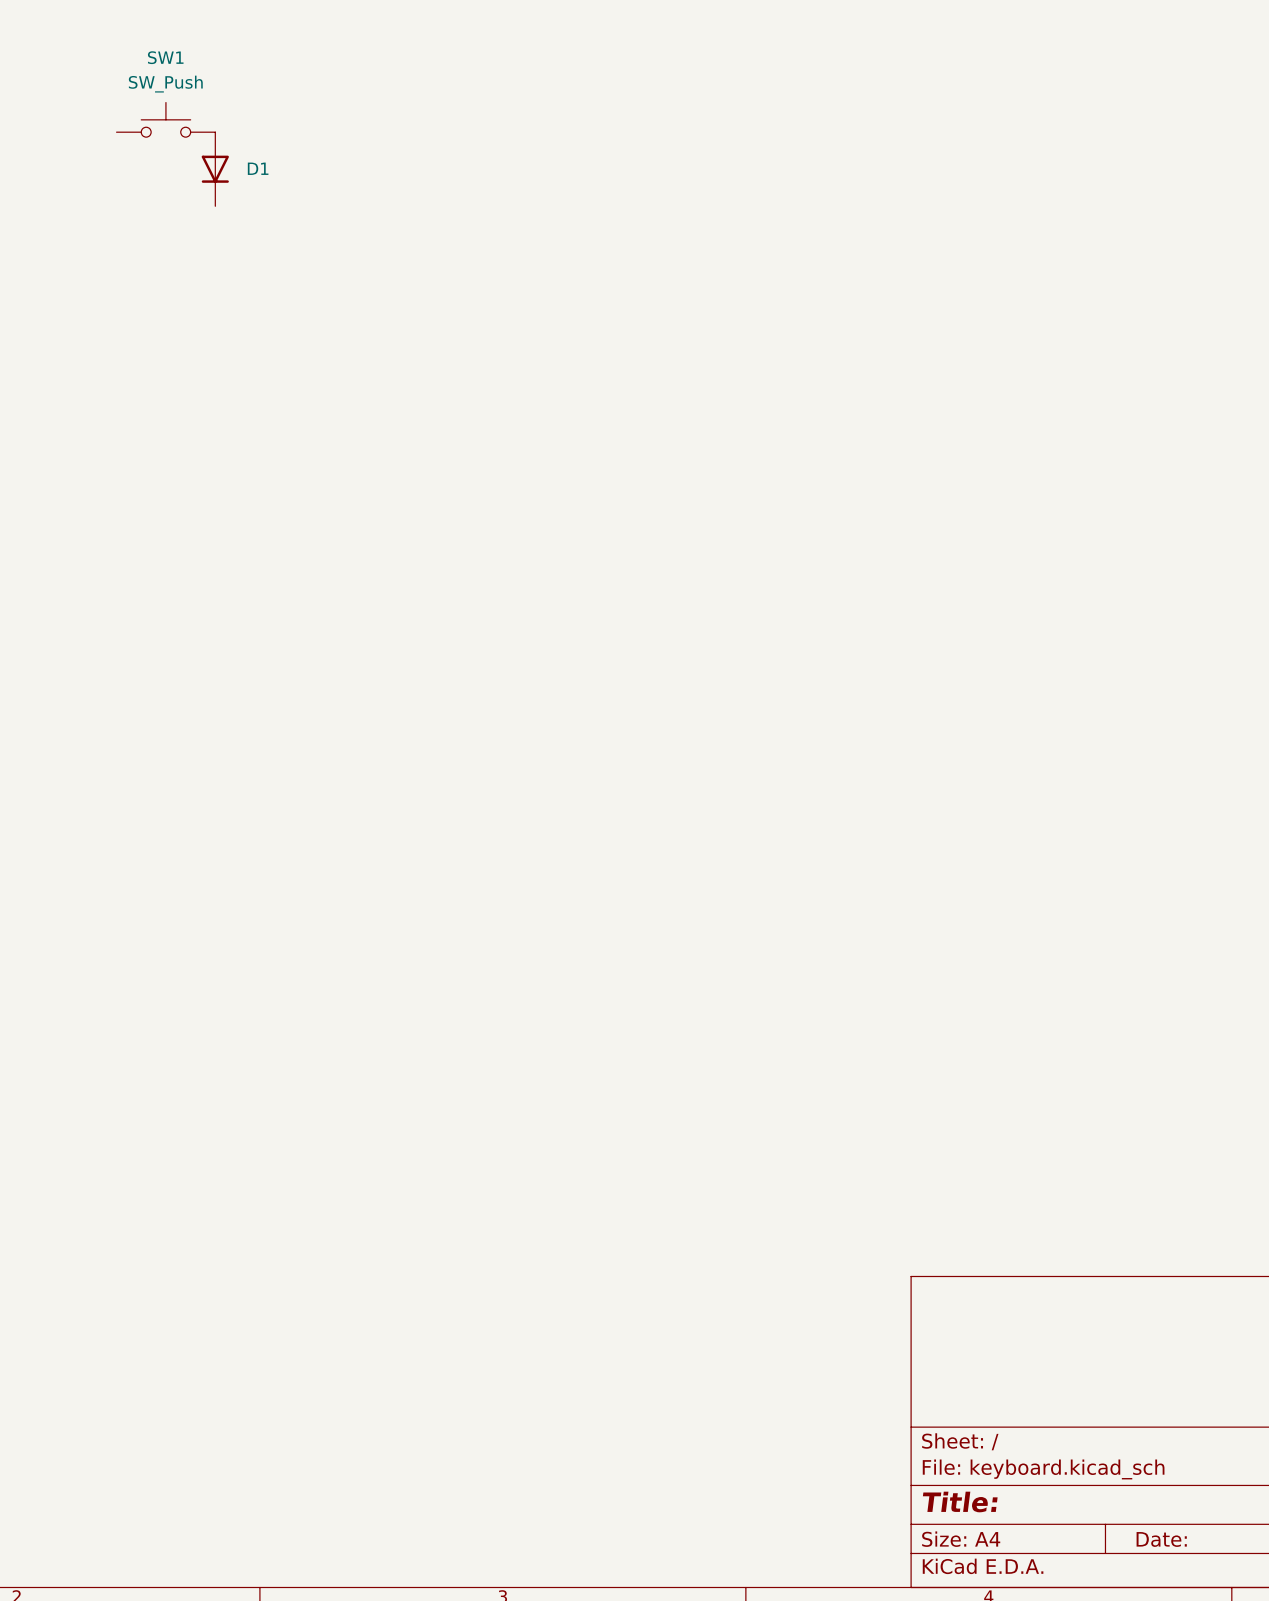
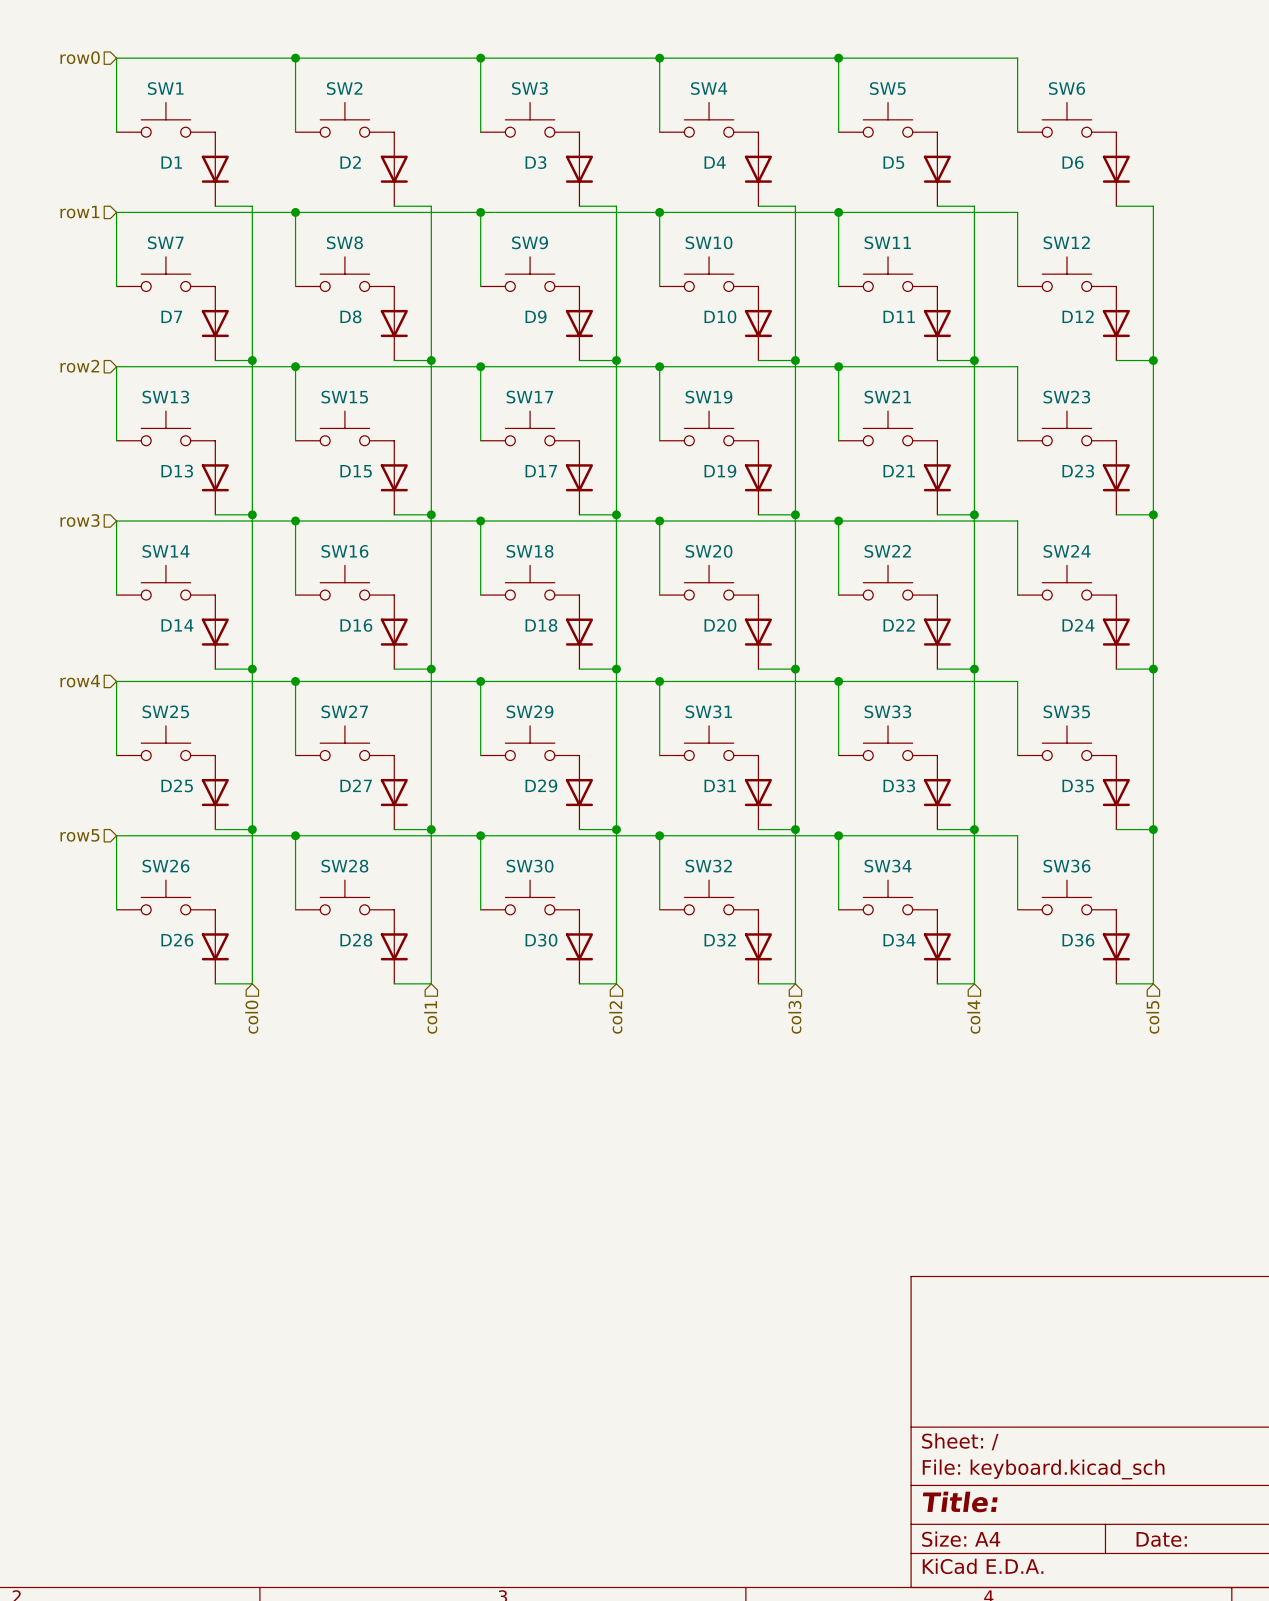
hierarchical label: none -> row0 (80, 57)
SW1 name position: SW1 (165, 57) -> SW1 (165, 88)
wire: none -> (295, 58) (295, 132)
junction: none -> (295, 58)
wire: none -> (480, 58) (480, 132)
junction: none -> (480, 58)
wire: none -> (659, 58) (659, 132)
junction: none -> (659, 58)
wire: none -> (838, 58) (838, 132)
junction: none -> (838, 58)
SW1 value: SW_Push (165, 84) -> none
SW2: none -> (344, 119)
SW3: none -> (530, 119)
SW4: none -> (709, 119)
SW5: none -> (888, 119)
SW6: none -> (1066, 119)
wire: none -> (116, 132) (116, 58) (1017, 58) (1017, 132)
D1 name position: D1 (258, 168) -> D1 (171, 162)
D2: none -> (394, 169)
D3: none -> (579, 169)
D4: none -> (758, 169)
D5: none -> (937, 169)
D6: none -> (1116, 169)
wire: none -> (215, 206) (252, 206) (252, 983) (215, 983)
wire: none -> (394, 206) (431, 206) (431, 829)
wire: none -> (579, 206) (616, 206) (616, 983) (579, 983)
wire: none -> (758, 206) (795, 206) (795, 983) (758, 983)
wire: none -> (937, 206) (974, 206) (974, 983) (937, 983)
wire: none -> (1116, 206) (1153, 206) (1153, 983) (1116, 983)
hierarchical label: none -> row1 (79, 212)
wire: none -> (295, 212) (295, 286)
junction: none -> (295, 212)
wire: none -> (480, 212) (480, 286)
junction: none -> (480, 212)
wire: none -> (659, 212) (659, 286)
junction: none -> (659, 212)
wire: none -> (838, 212) (838, 286)
junction: none -> (838, 212)
SW7: none -> (165, 274)
SW8: none -> (344, 274)
SW9: none -> (530, 274)
SW10: none -> (709, 274)
SW11: none -> (888, 274)
SW12: none -> (1066, 274)
wire: none -> (116, 286) (116, 212) (1017, 212) (1017, 286)
D7: none -> (215, 323)
D8: none -> (394, 323)
D9: none -> (579, 323)
D10: none -> (758, 323)
D11: none -> (937, 323)
D12: none -> (1116, 323)
wire: none -> (215, 360) (252, 360)
junction: none -> (252, 360)
wire: none -> (394, 360) (431, 360)
junction: none -> (431, 360)
wire: none -> (579, 360) (616, 360)
junction: none -> (616, 360)
wire: none -> (758, 360) (795, 360)
junction: none -> (795, 360)
wire: none -> (937, 360) (974, 360)
junction: none -> (974, 360)
wire: none -> (1116, 360) (1153, 360)
junction: none -> (1153, 360)
hierarchical label: none -> row2 (79, 366)
wire: none -> (295, 366) (295, 440)
junction: none -> (295, 366)
wire: none -> (480, 366) (480, 440)
junction: none -> (480, 366)
wire: none -> (659, 366) (659, 440)
junction: none -> (659, 366)
wire: none -> (838, 366) (838, 440)
junction: none -> (838, 366)
SW13: none -> (165, 428)
SW15: none -> (344, 428)
SW17: none -> (530, 428)
SW19: none -> (709, 428)
SW21: none -> (888, 428)
SW23: none -> (1066, 428)
wire: none -> (116, 440) (116, 366) (1017, 366) (1017, 440)
D13: none -> (215, 477)
D15: none -> (394, 477)
D17: none -> (579, 477)
D19: none -> (758, 477)
D21: none -> (937, 477)
D23: none -> (1116, 477)
wire: none -> (215, 514) (252, 514)
junction: none -> (252, 514)
wire: none -> (394, 514) (431, 514)
junction: none -> (431, 514)
wire: none -> (579, 514) (616, 514)
junction: none -> (616, 514)
wire: none -> (758, 514) (795, 514)
junction: none -> (795, 514)
wire: none -> (937, 514) (974, 514)
junction: none -> (974, 514)
wire: none -> (1116, 514) (1153, 514)
junction: none -> (1153, 514)
hierarchical label: none -> row3 (80, 520)
wire: none -> (295, 520) (295, 595)
junction: none -> (295, 520)
wire: none -> (480, 520) (480, 595)
junction: none -> (480, 520)
wire: none -> (659, 520) (659, 595)
junction: none -> (659, 520)
wire: none -> (838, 520) (838, 595)
junction: none -> (838, 520)
SW14: none -> (165, 582)
SW16: none -> (344, 582)
SW18: none -> (530, 582)
SW20: none -> (709, 582)
SW22: none -> (888, 582)
SW24: none -> (1066, 582)
wire: none -> (116, 595) (116, 520) (1017, 520) (1017, 595)
D14: none -> (215, 632)
D16: none -> (394, 632)
D18: none -> (579, 632)
D20: none -> (758, 632)
D22: none -> (937, 632)
D24: none -> (1116, 632)
wire: none -> (215, 669) (252, 669)
junction: none -> (252, 669)
wire: none -> (394, 669) (431, 669)
junction: none -> (431, 669)
wire: none -> (579, 669) (616, 669)
junction: none -> (616, 669)
wire: none -> (758, 669) (795, 669)
junction: none -> (795, 669)
wire: none -> (937, 669) (974, 669)
junction: none -> (974, 669)
wire: none -> (1116, 669) (1153, 669)
junction: none -> (1153, 669)
hierarchical label: none -> row4 (80, 681)
wire: none -> (295, 681) (295, 755)
junction: none -> (295, 681)
wire: none -> (480, 681) (480, 755)
junction: none -> (480, 681)
wire: none -> (659, 681) (659, 755)
junction: none -> (659, 681)
wire: none -> (838, 681) (838, 755)
junction: none -> (838, 681)
SW25: none -> (165, 743)
SW27: none -> (344, 743)
SW29: none -> (530, 743)
SW31: none -> (709, 743)
SW33: none -> (888, 743)
SW35: none -> (1066, 743)
wire: none -> (116, 755) (116, 681) (1017, 681) (1017, 755)
D25: none -> (215, 792)
D27: none -> (394, 792)
D29: none -> (579, 792)
D31: none -> (758, 792)
D33: none -> (937, 792)
D35: none -> (1116, 792)
wire: none -> (215, 829) (252, 829)
junction: none -> (252, 829)
wire: none -> (394, 829) (431, 829)
wire: none -> (431, 829) (431, 983) (394, 983)
junction: none -> (431, 829)
wire: none -> (579, 829) (616, 829)
junction: none -> (616, 829)
wire: none -> (758, 829) (795, 829)
junction: none -> (795, 829)
wire: none -> (937, 829) (974, 829)
junction: none -> (974, 829)
wire: none -> (1116, 829) (1153, 829)
junction: none -> (1153, 829)
hierarchical label: none -> row5 (79, 835)
wire: none -> (295, 835) (295, 909)
junction: none -> (295, 835)
wire: none -> (480, 835) (480, 909)
junction: none -> (480, 835)
wire: none -> (659, 835) (659, 909)
junction: none -> (659, 835)
wire: none -> (838, 835) (838, 909)
junction: none -> (838, 835)
SW26: none -> (165, 897)
SW28: none -> (344, 897)
SW30: none -> (530, 897)
SW32: none -> (709, 897)
SW34: none -> (888, 897)
SW36: none -> (1066, 897)
wire: none -> (116, 909) (116, 835) (1017, 835) (1017, 909)
D26: none -> (215, 946)
D28: none -> (394, 946)
D30: none -> (579, 946)
D32: none -> (758, 946)
D34: none -> (937, 946)
D36: none -> (1116, 946)
hierarchical label: none -> col0 (251, 1017)
hierarchical label: none -> col1 (430, 1017)
hierarchical label: none -> col2 (615, 1017)
hierarchical label: none -> col3 (794, 1017)
hierarchical label: none -> col4 (973, 1017)
hierarchical label: none -> col5 (1152, 1017)

